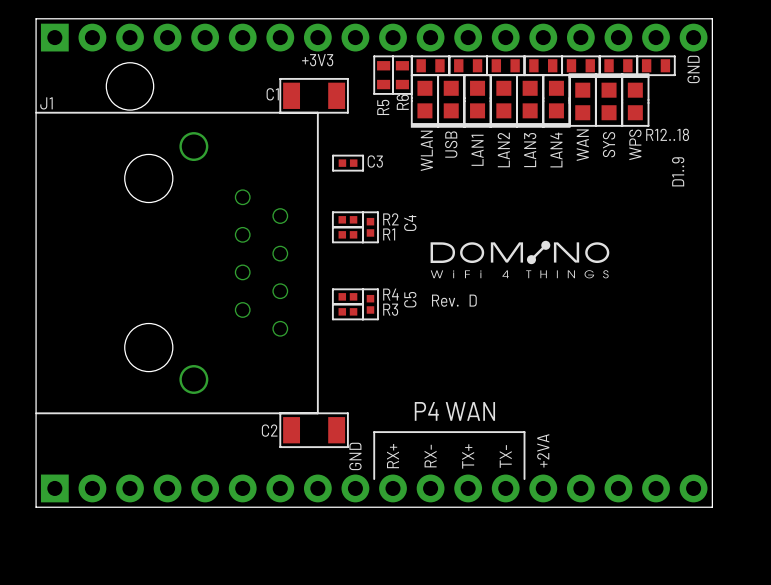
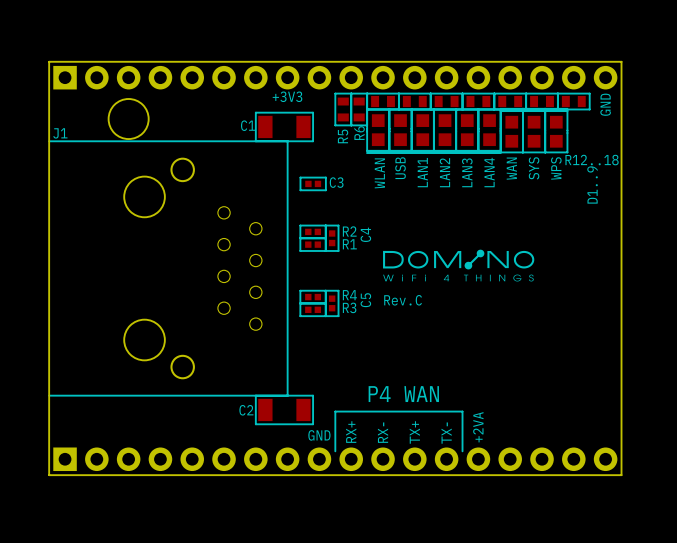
text: D (473, 300) -> C (418, 300)
text rotation: 0° (355, 456) -> 90° clockwise (319, 435)

